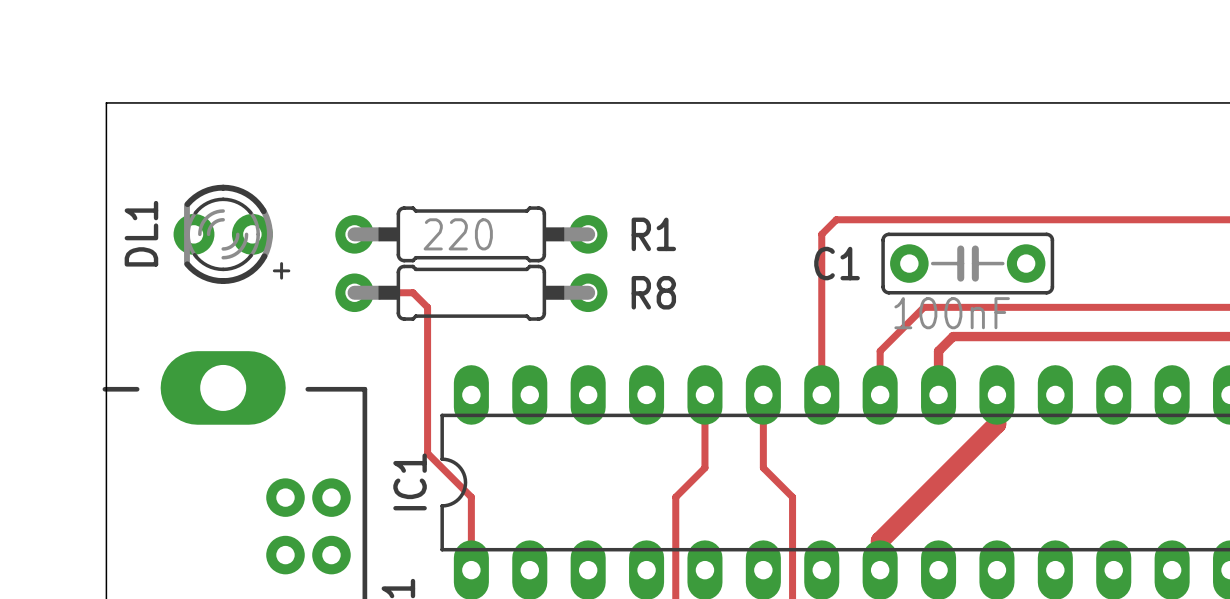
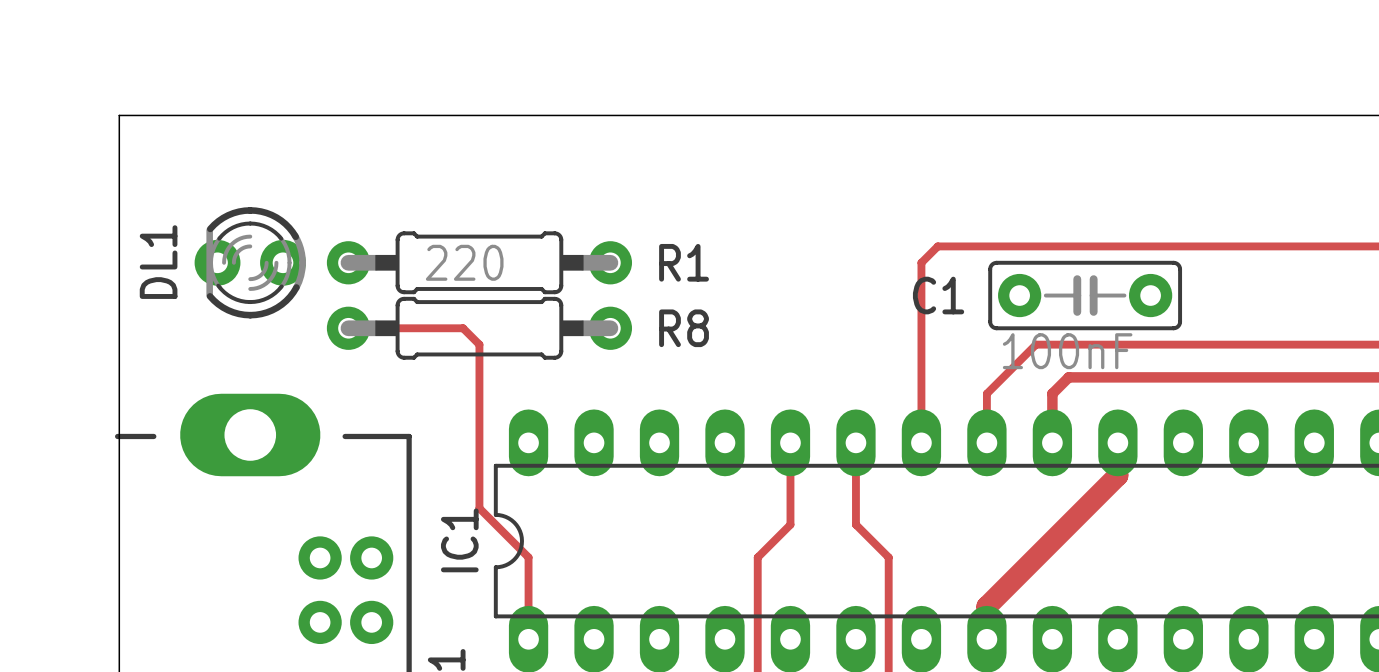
DL1 footprint: [173, 184, 291, 285] -> [194, 207, 306, 319]
R1 position: (471, 234) -> (479, 262)
R8 position: (471, 292) -> (479, 328)

